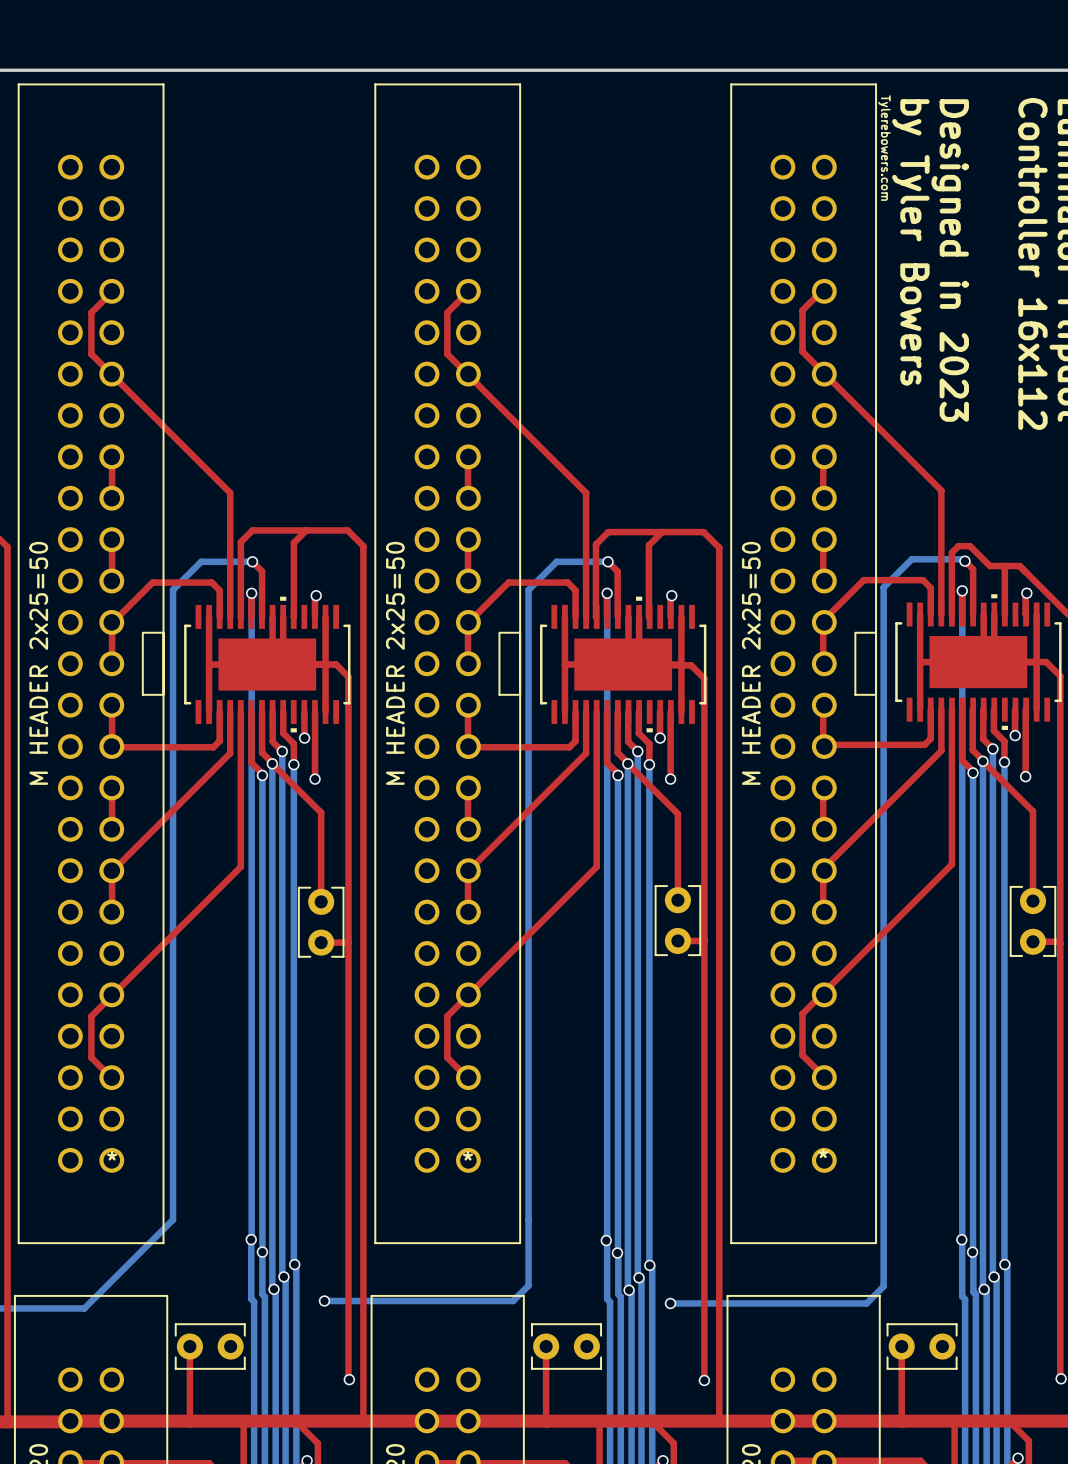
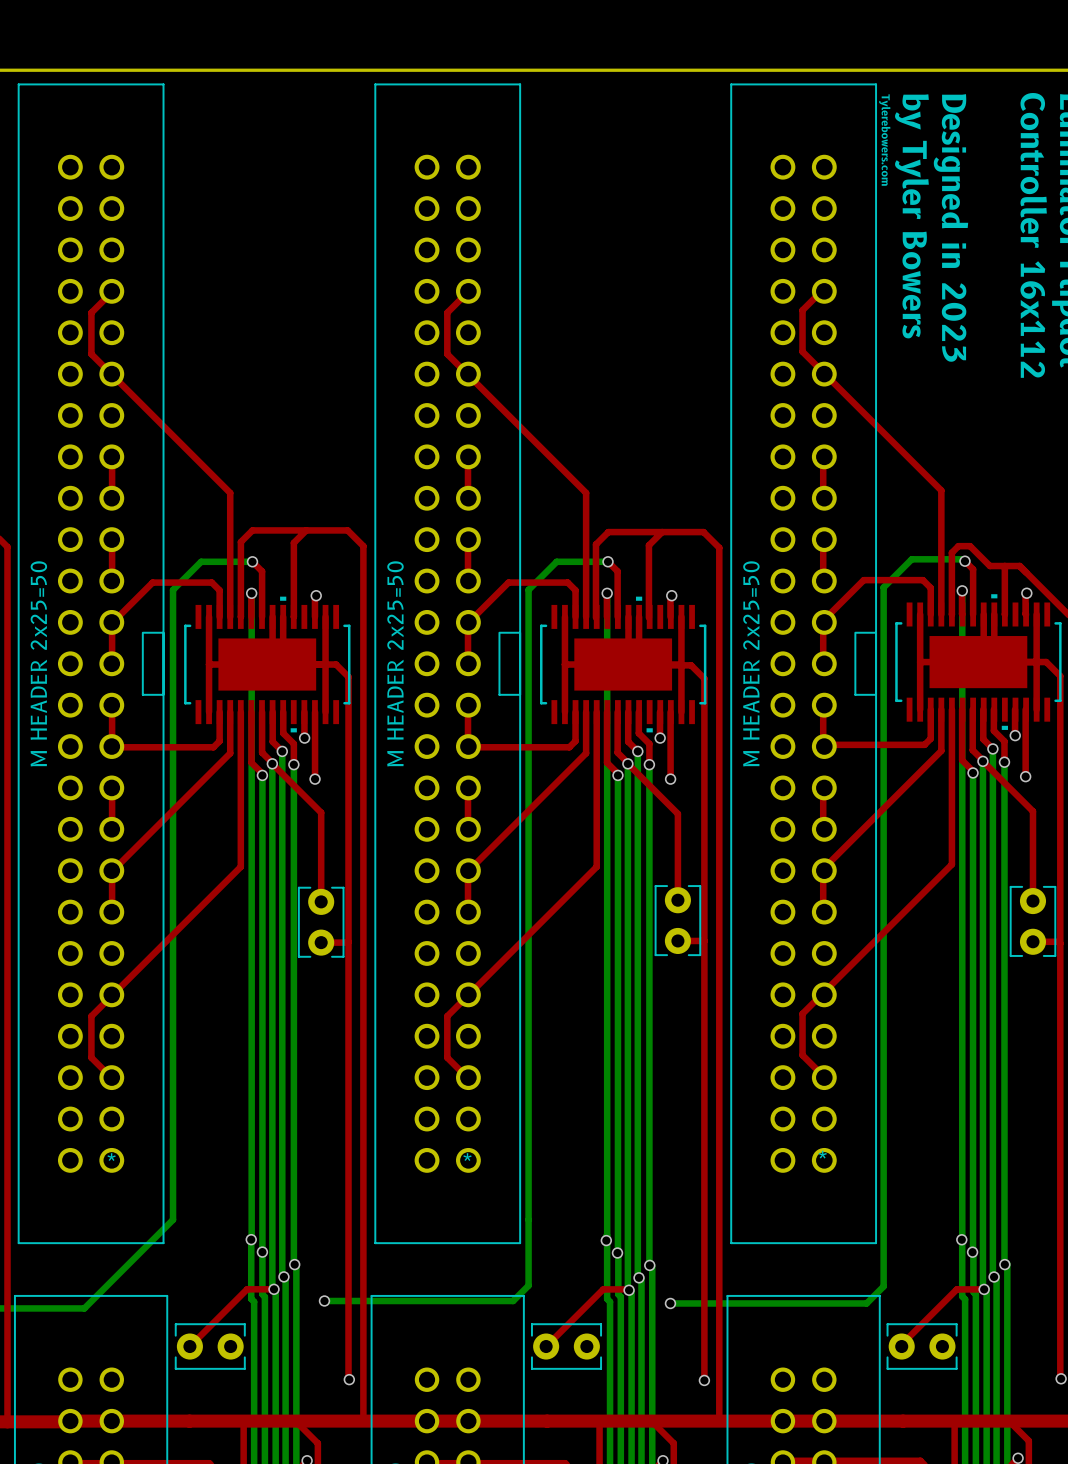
top track: (189, 1346) (189, 1420) -> (189, 1346) (247, 1289) (274, 1289)
top track: (546, 1346) (546, 1420) -> (546, 1346) (603, 1289) (629, 1290)
top track: (901, 1346) (901, 1419) -> (901, 1346) (956, 1289) (984, 1289)

